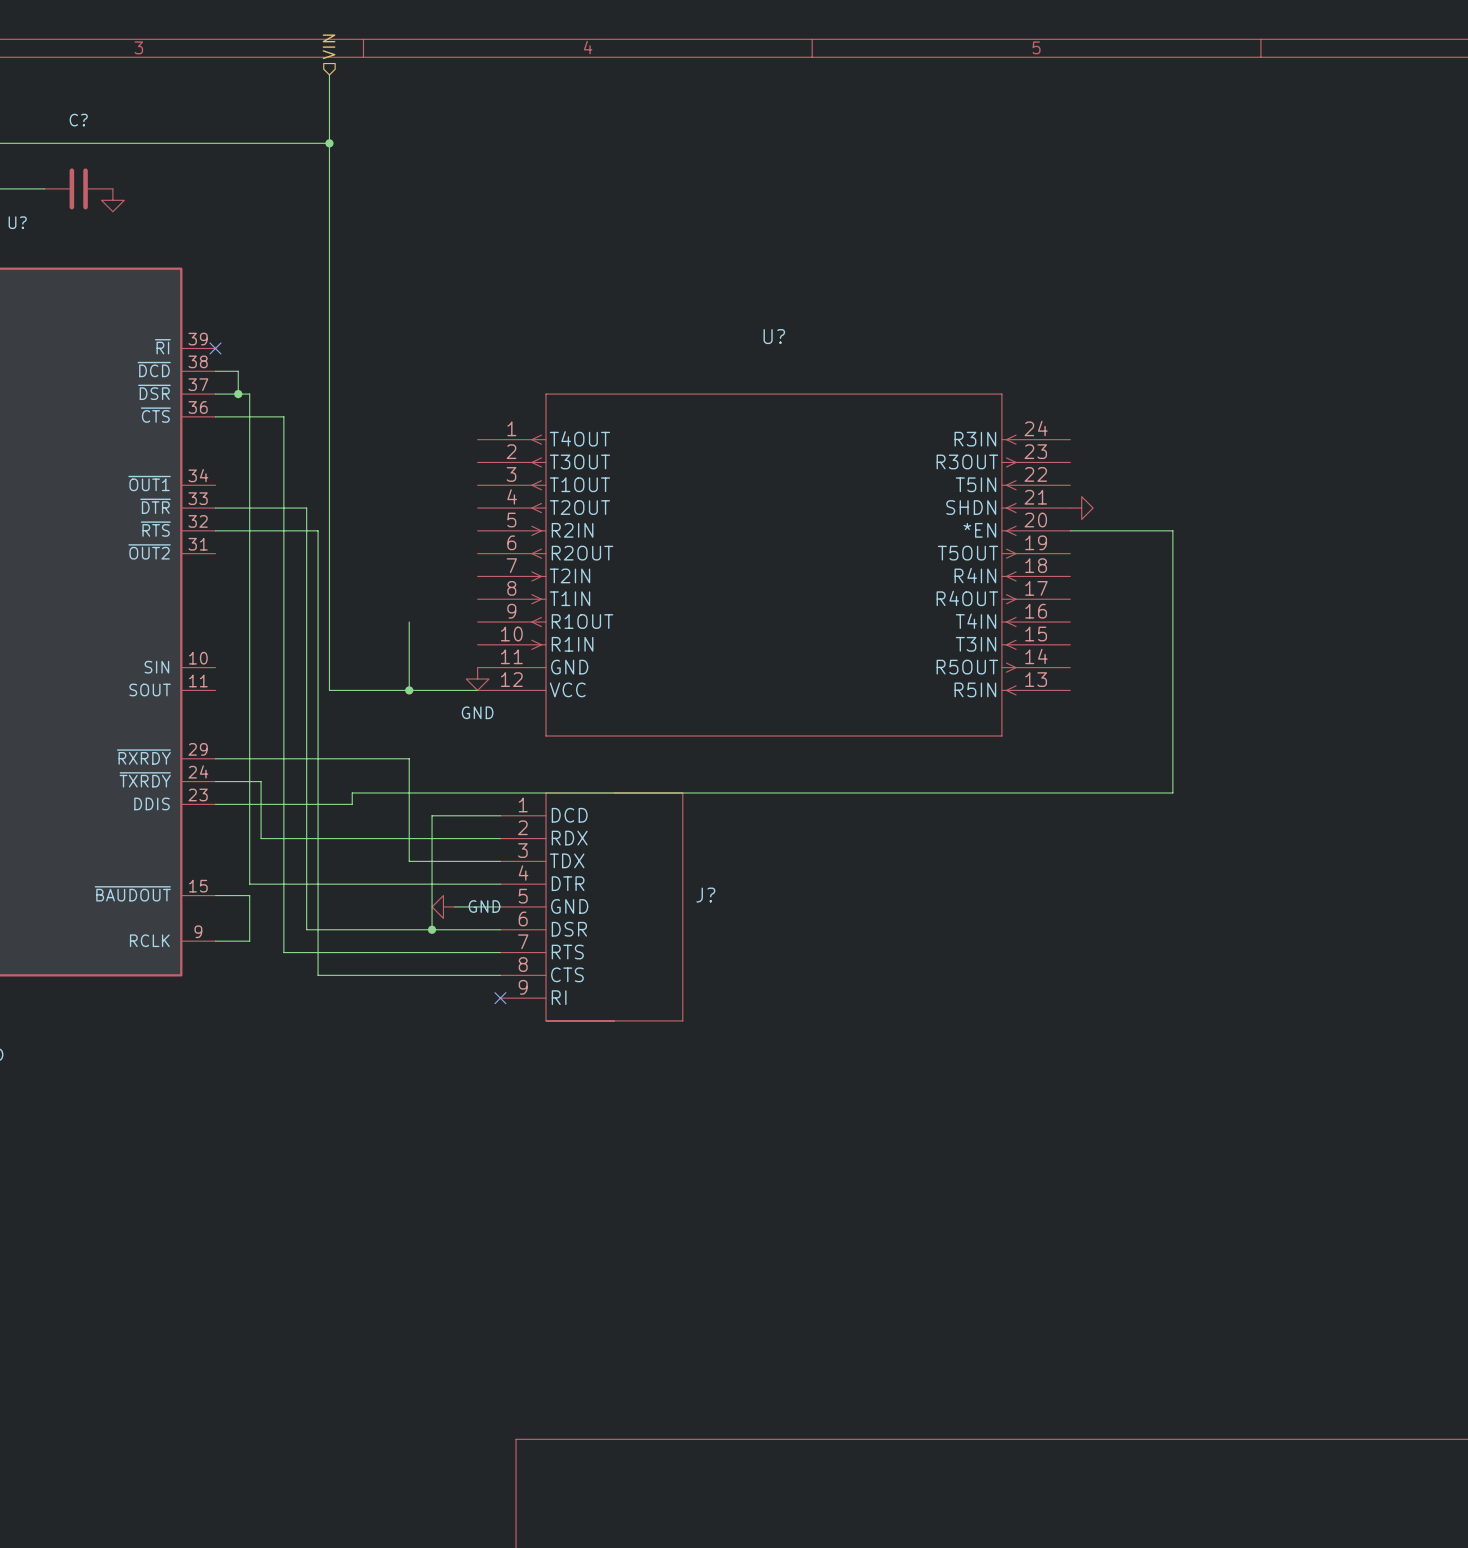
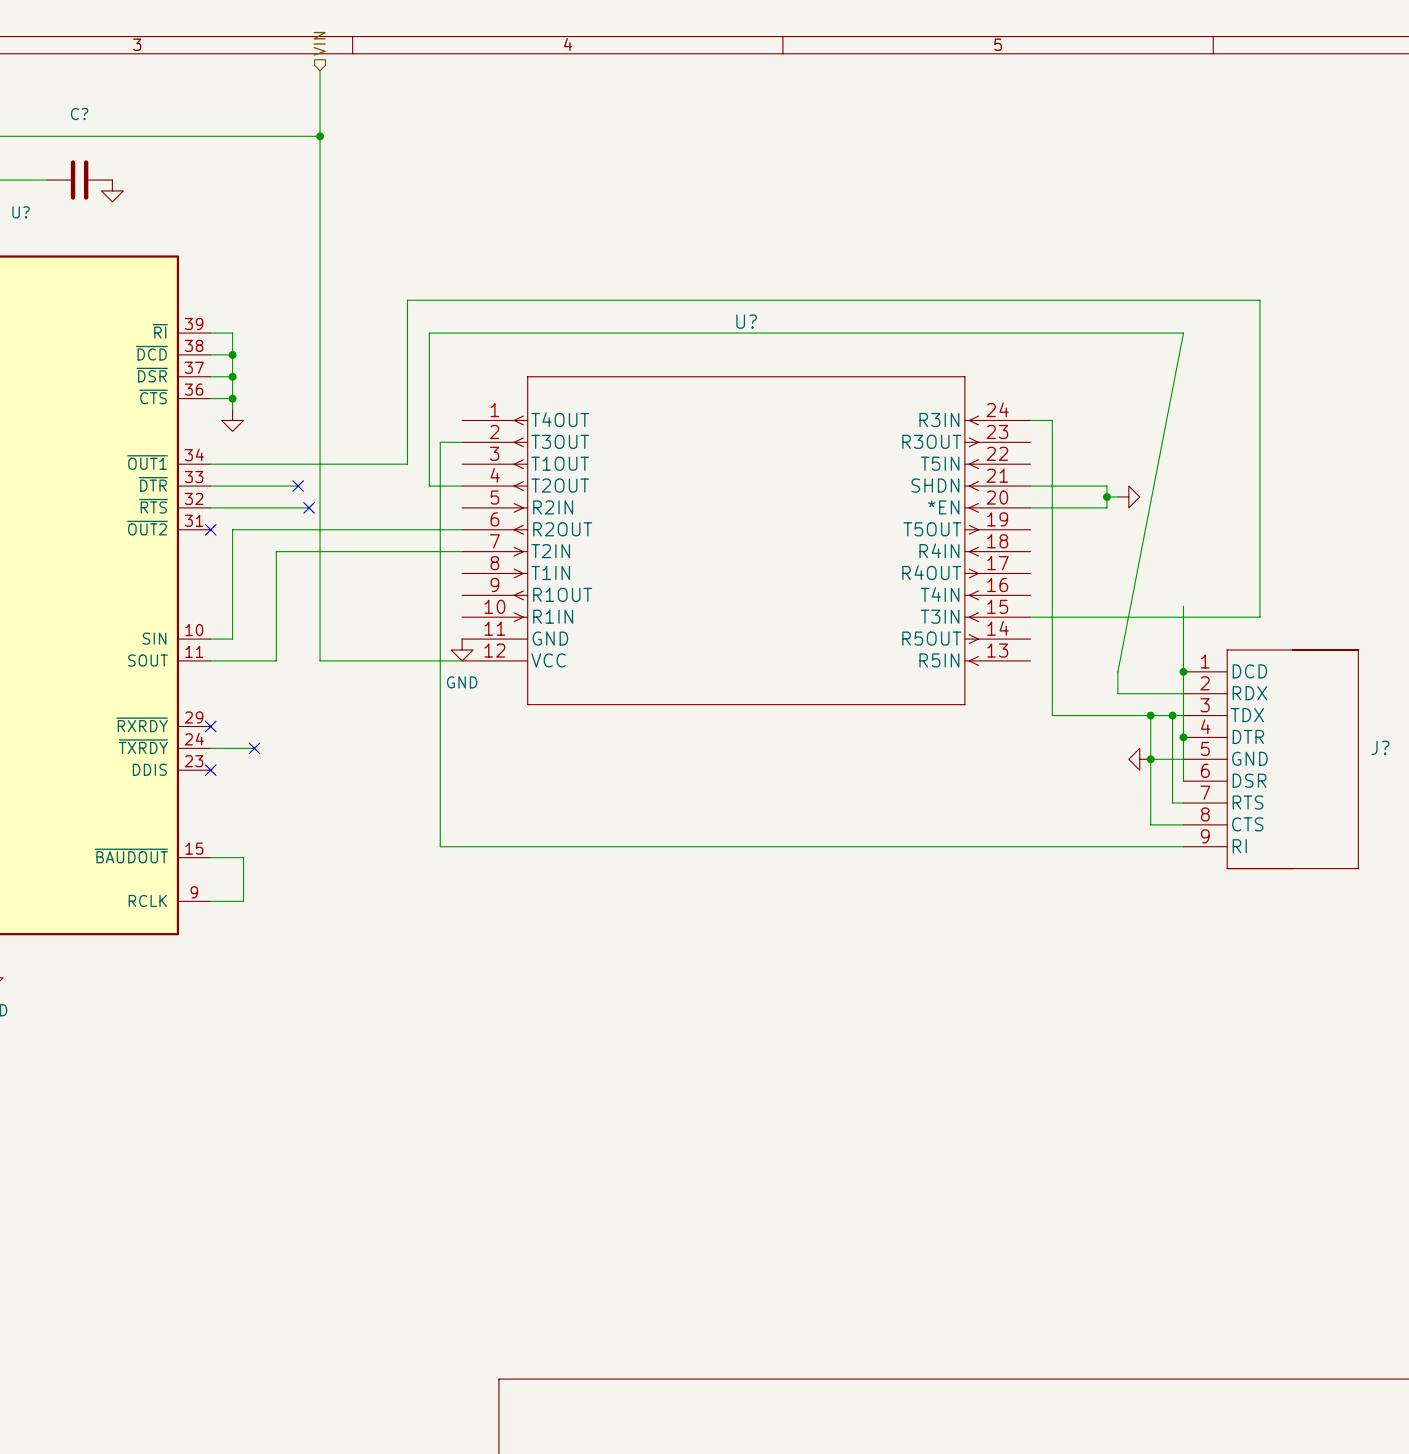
wire: none -> (210, 333) (232, 333) (232, 354)
no-connect mark: (215, 348) -> none
junction: none -> (232, 354)
wire: (238, 394) (249, 394) (249, 884) (454, 884) -> (462, 442) (440, 442) (440, 846)
wire: none -> (232, 376) (232, 409)
wire: (238, 416) (283, 416) (283, 576) -> (462, 551) (276, 551)
junction: none -> (232, 398)
power symbol: none -> (232, 420)
wire: none -> (1030, 420) (1052, 420) (1052, 715) (1183, 715)
wire: none -> (210, 464) (407, 464) (407, 300) (1259, 300) (1259, 617) (1030, 617)
wire: (306, 508) (306, 929) (500, 929) -> none
no-connect mark: none -> (298, 486)
wire: none -> (462, 486) (429, 486) (429, 333) (1183, 333) (1117, 671) (1117, 693) (1183, 693)
power symbol position: (1081, 508) -> (1128, 496)
wire: none -> (1106, 496) (1117, 496)
junction: none -> (1106, 496)
wire: (318, 530) (318, 975) (500, 975) -> none
no-connect mark: none -> (309, 507)
wire: (1150, 530) (1172, 530) (1172, 792) (352, 792) (352, 804) (215, 804) -> (1106, 507) (1106, 486) (1030, 486)
no-connect mark: none -> (210, 529)
wire: none -> (462, 529) (232, 529) (232, 639) (210, 639)
wire: (409, 622) (409, 690) -> none
wire: none -> (1183, 606) (1183, 781)
wire: (283, 690) (283, 952) (500, 952) -> (276, 660) (210, 660)
junction: (409, 690) -> none
junction: none -> (1183, 671)
wire: none -> (1150, 715) (1150, 824) (1183, 824)
junction: none -> (1150, 715)
wire: none -> (1172, 715) (1172, 803) (1183, 803)
junction: none -> (1172, 715)
wire: (215, 758) (409, 758) (409, 861) (500, 861) -> none
no-connect mark: none -> (210, 726)
junction: none -> (1183, 737)
wire: (261, 781) (261, 838) (500, 838) -> none
no-connect mark: none -> (254, 748)
power symbol: none -> (1139, 759)
wire: none -> (1150, 759) (1183, 759)
junction: none -> (1150, 759)
J?: none -> (1271, 759)
no-connect mark: none -> (210, 770)
wire: (500, 815) (432, 815) (432, 929) -> none
wire: none -> (483, 846) (1183, 846)
power symbol: GND (443, 906) -> none
wire: (454, 906) (500, 906) -> none
J?: (591, 906) -> none
junction: (432, 929) -> none
no-connect mark: (500, 998) -> none

